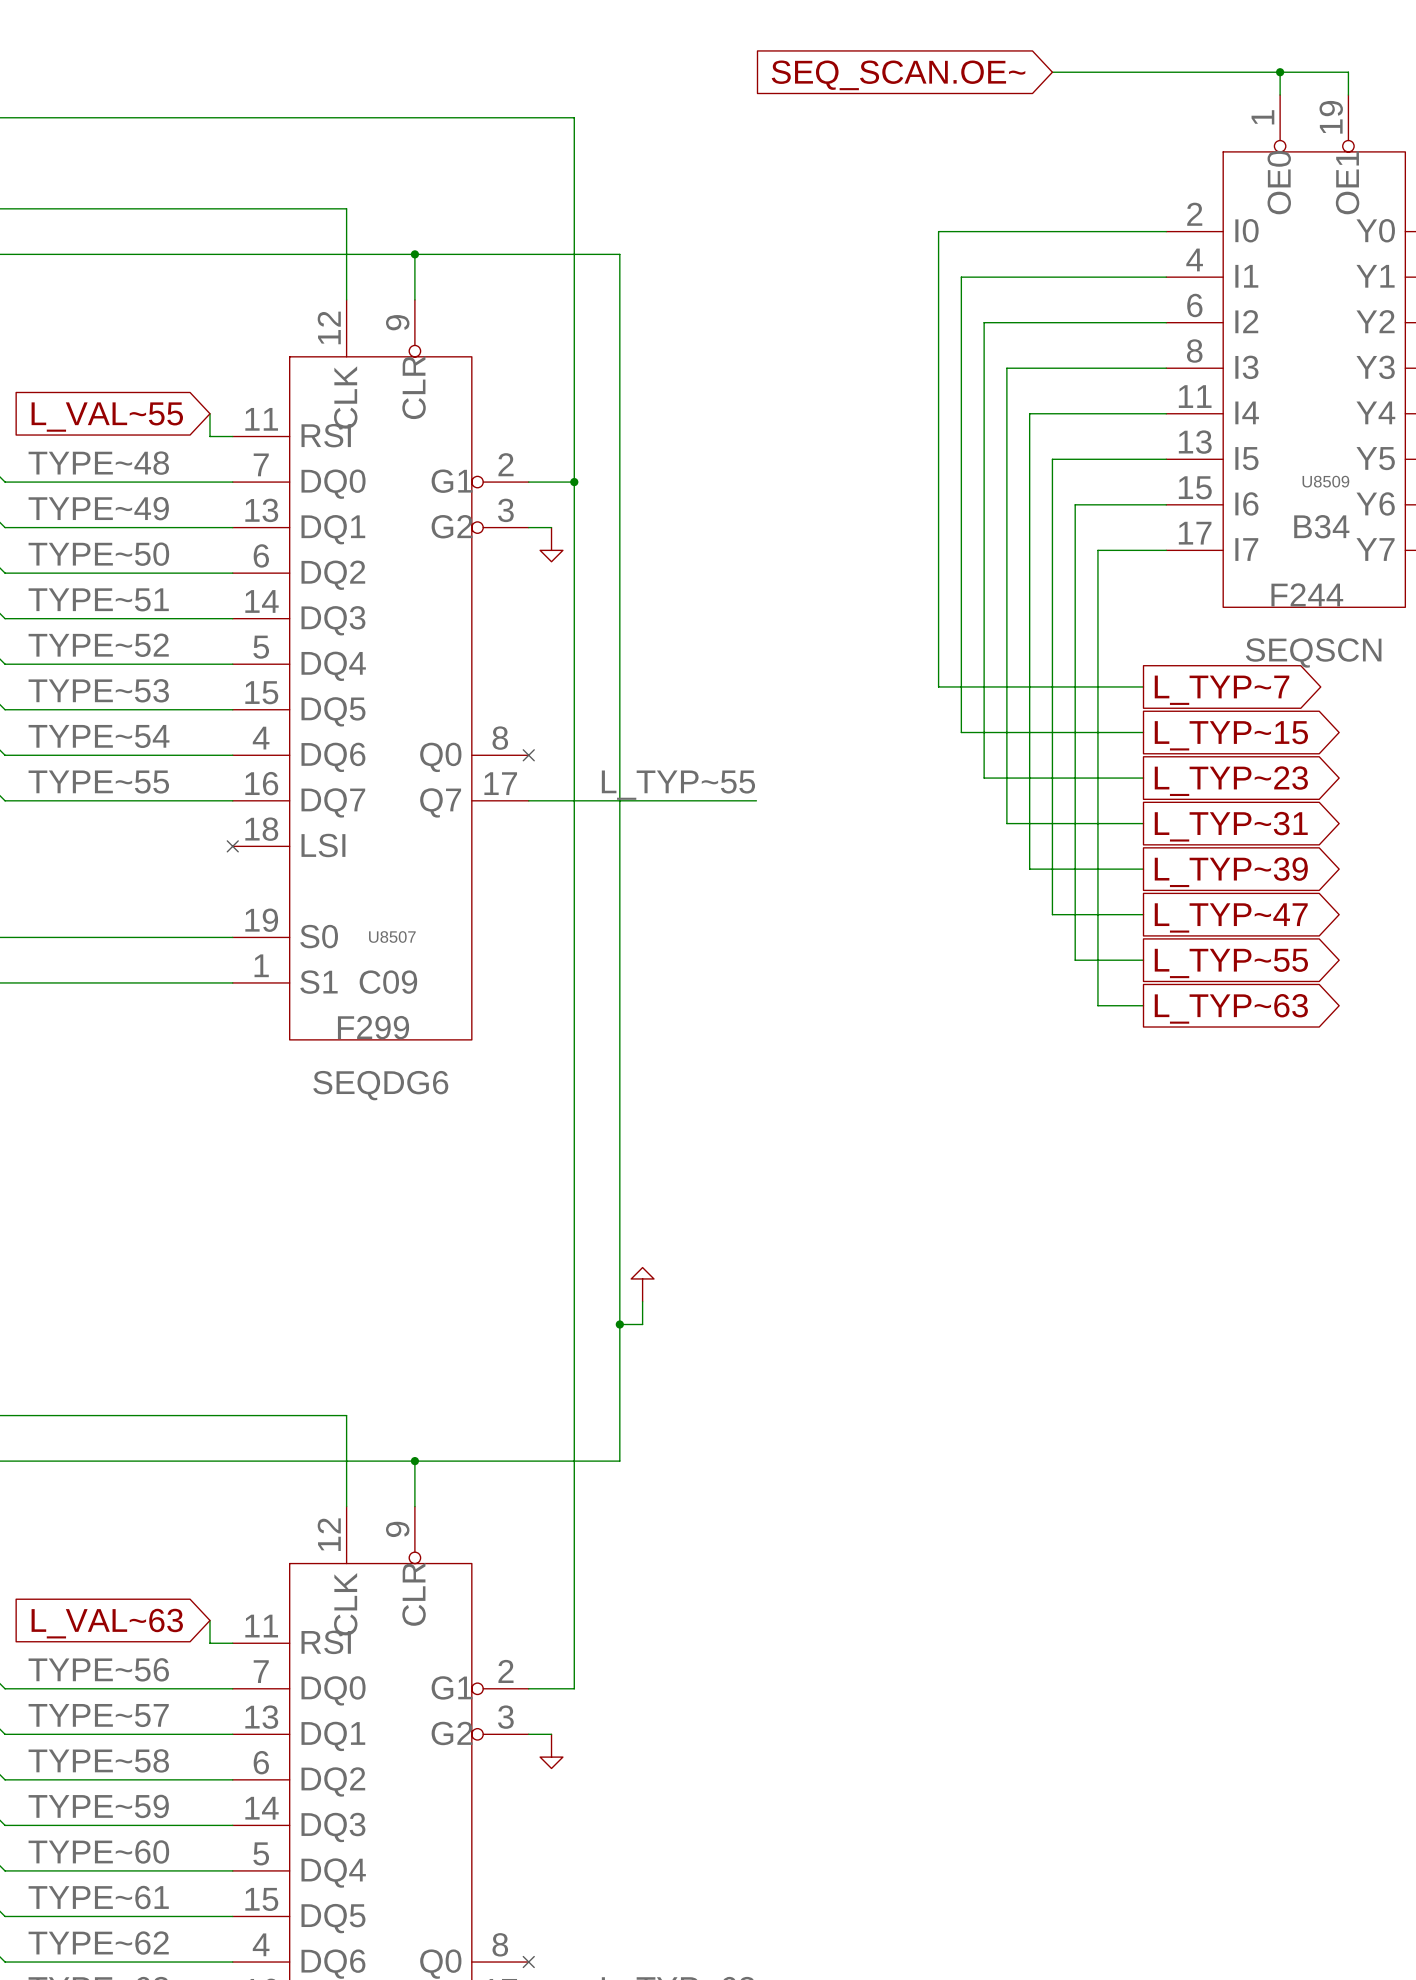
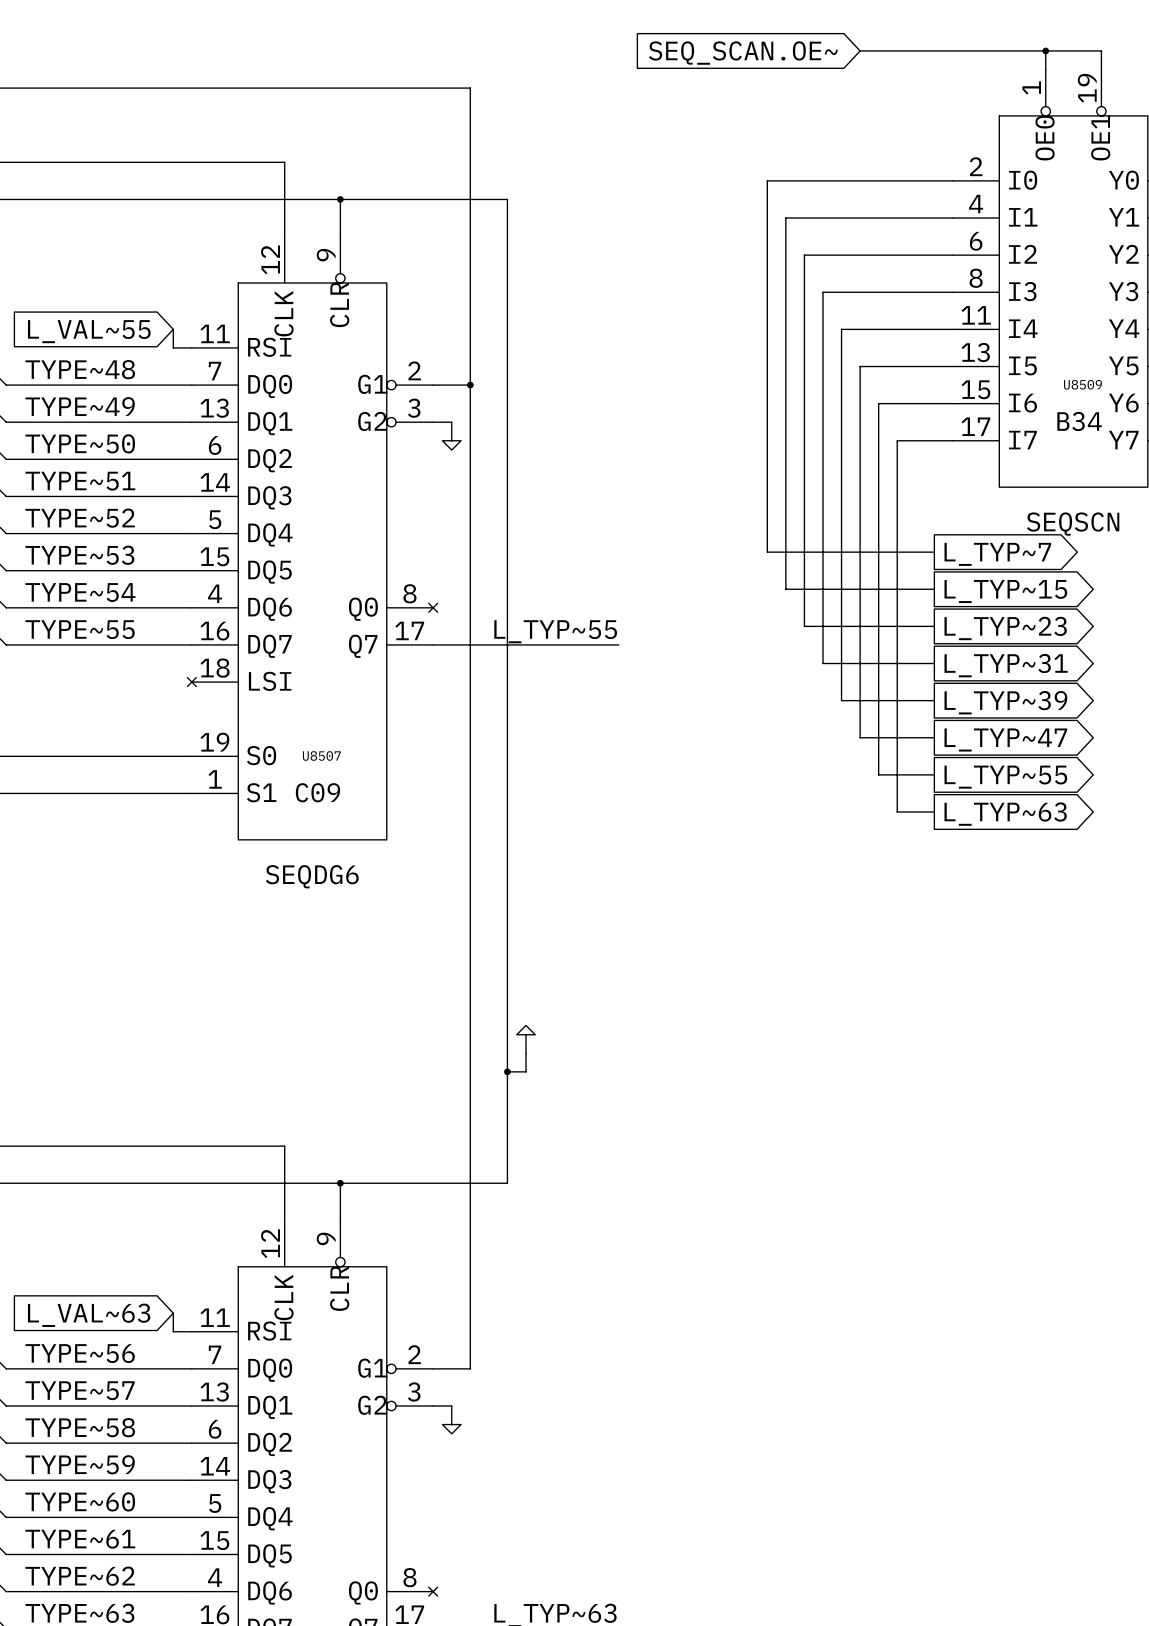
U8509 value: F244 (1307, 594) -> none
U8507 value: F299 (373, 1027) -> none

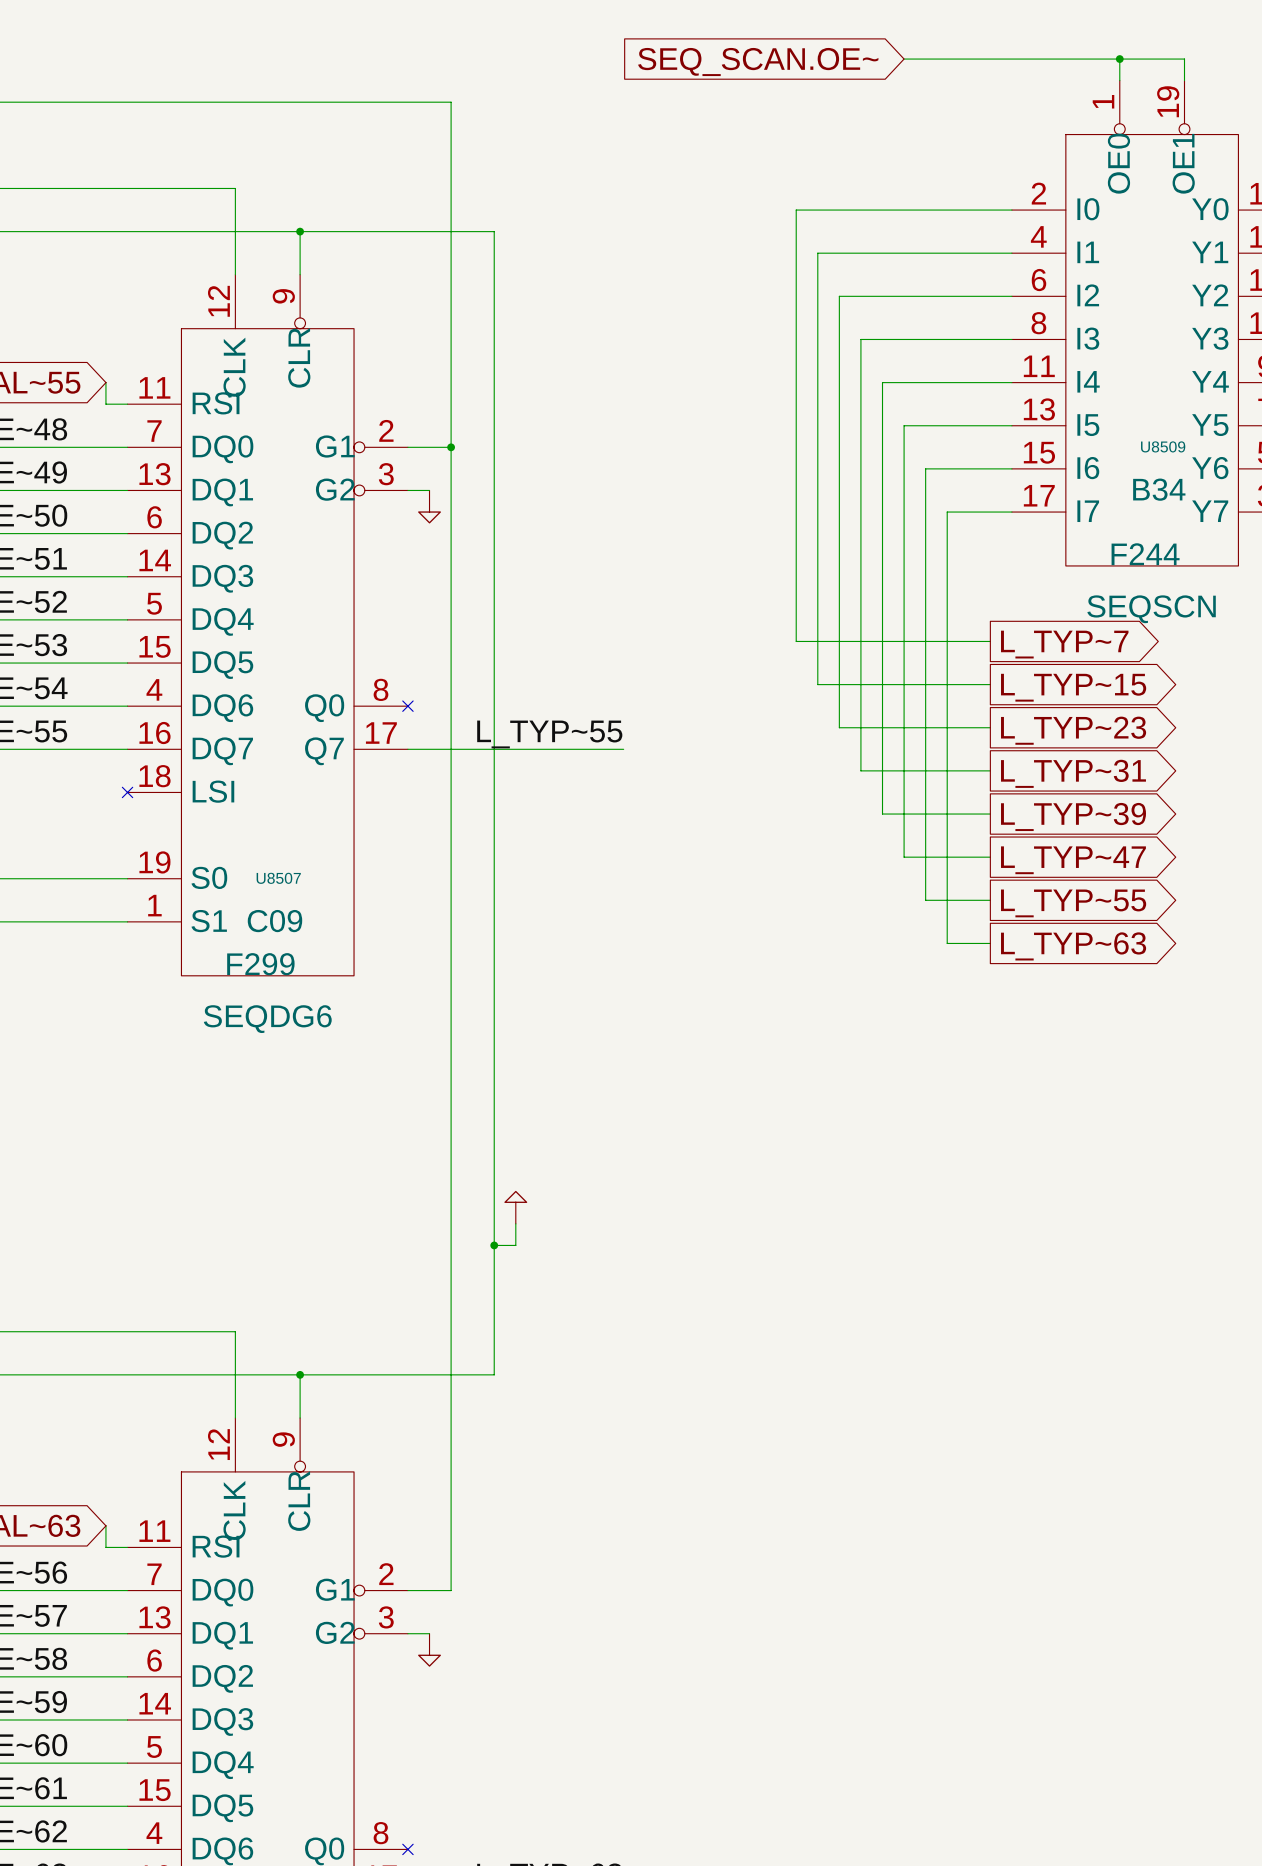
U8509 value: none -> F244 (1145, 554)
U8507 value: none -> F299 (260, 964)

